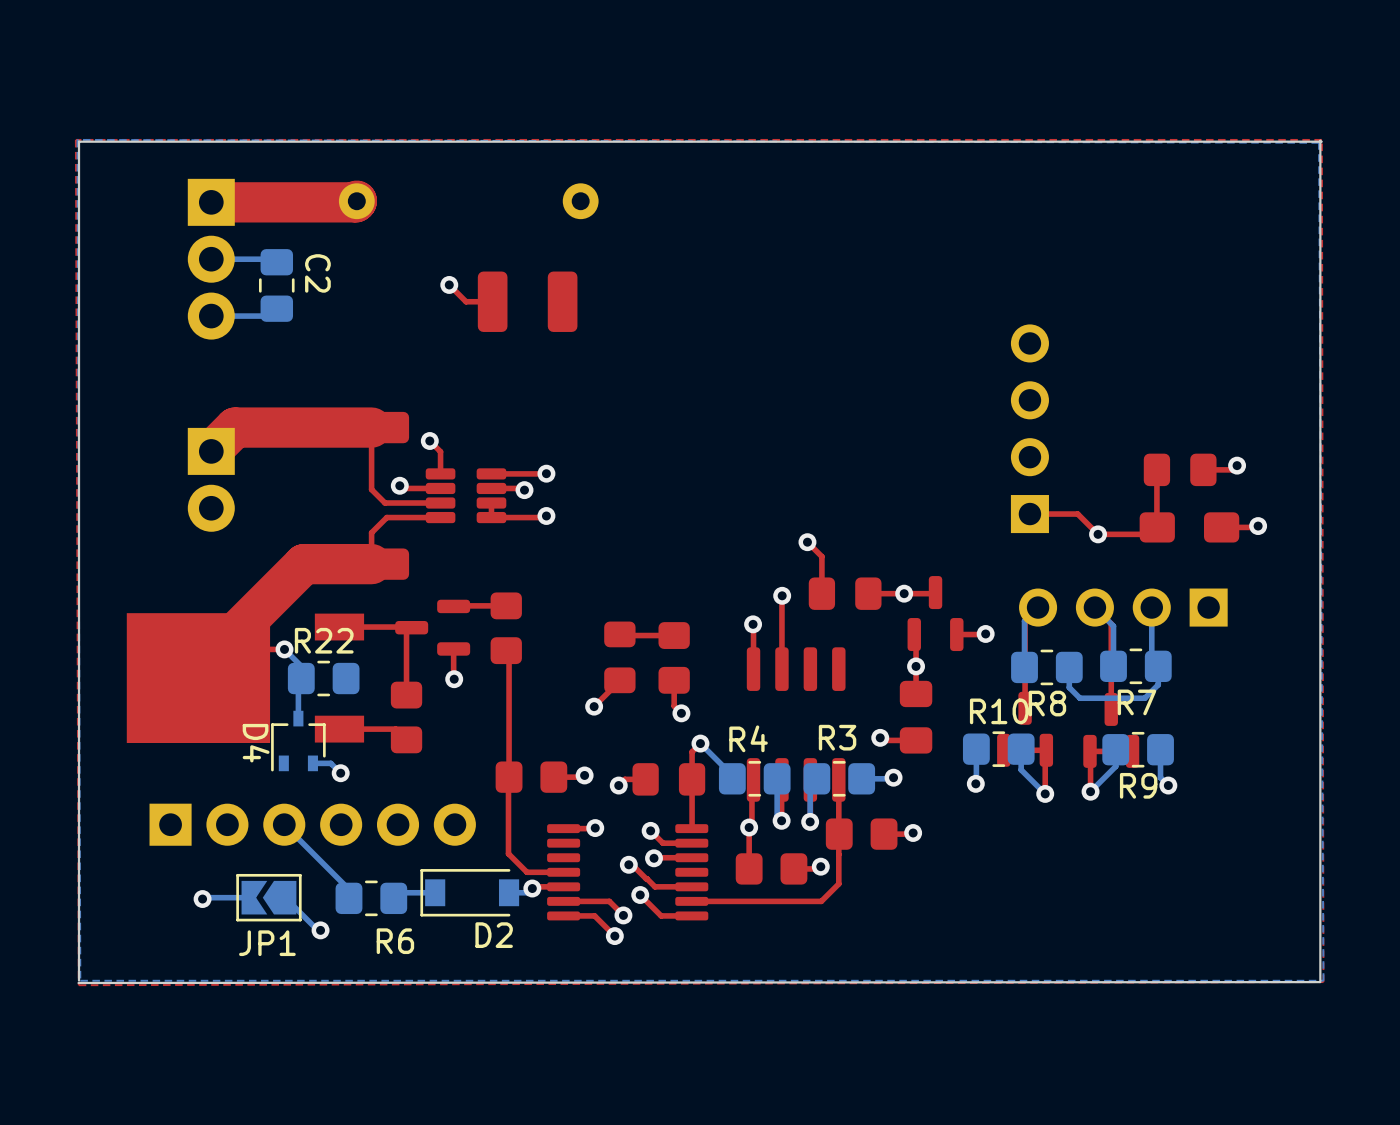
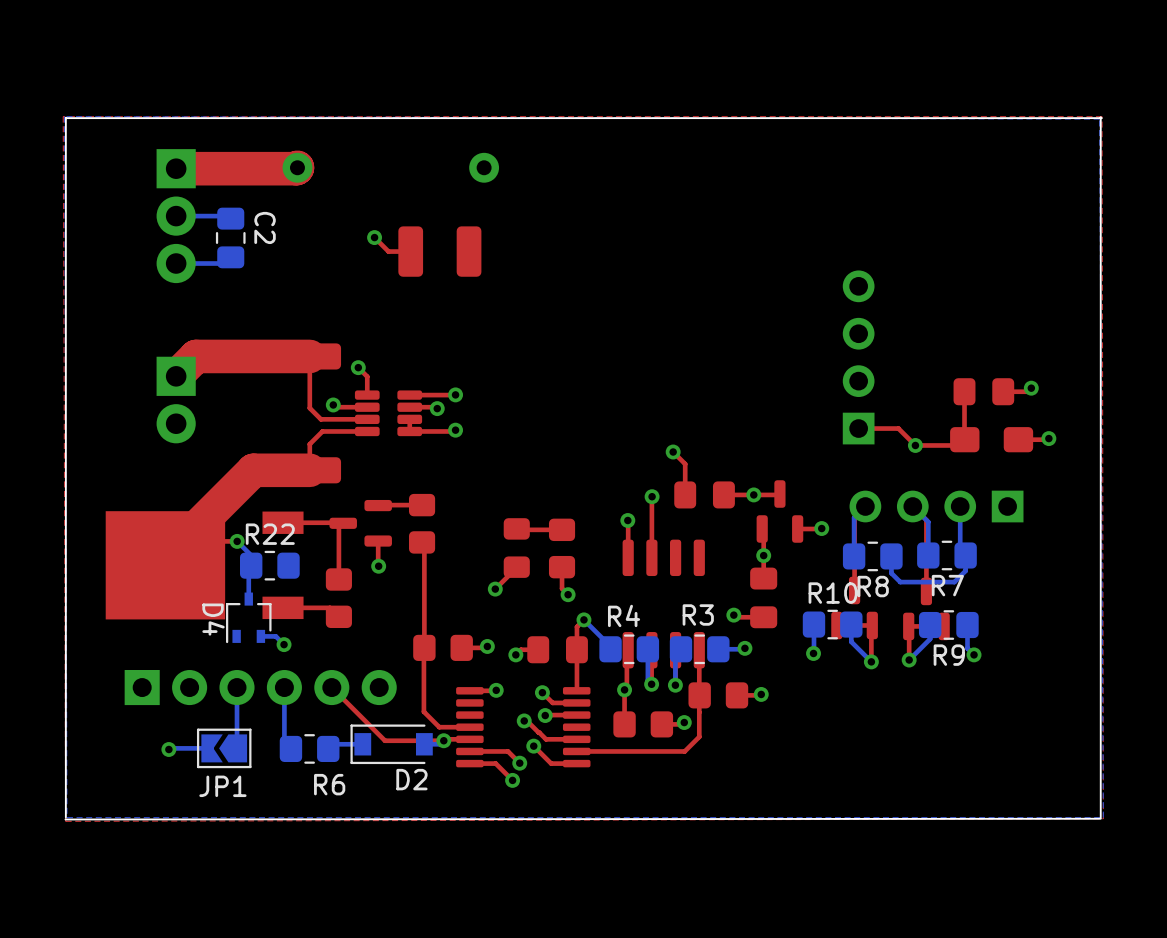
bottom track: (284, 824) (348, 889) (348, 898) -> (237, 687) (237, 747)
bottom track: none -> (284, 687) (284, 742)
top track: none -> (331, 687) (385, 740) (443, 740)
bottom track: (285, 897) (317, 930) (320, 930) -> none
via: (320, 930) -> none

